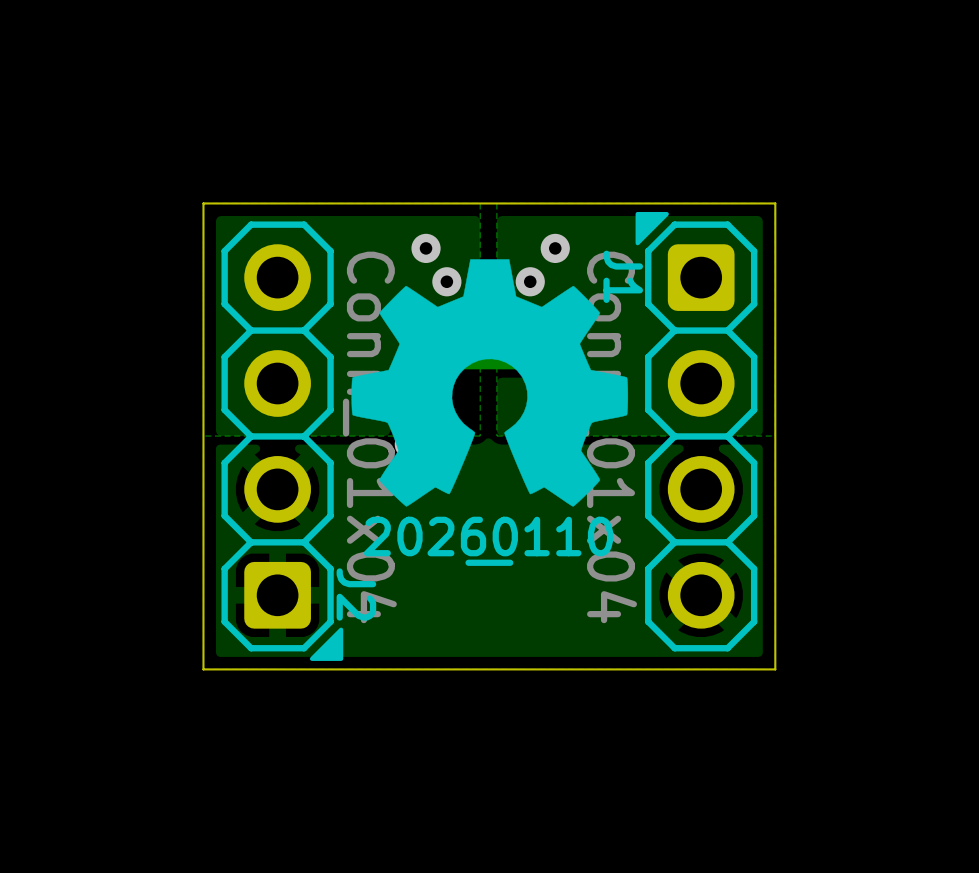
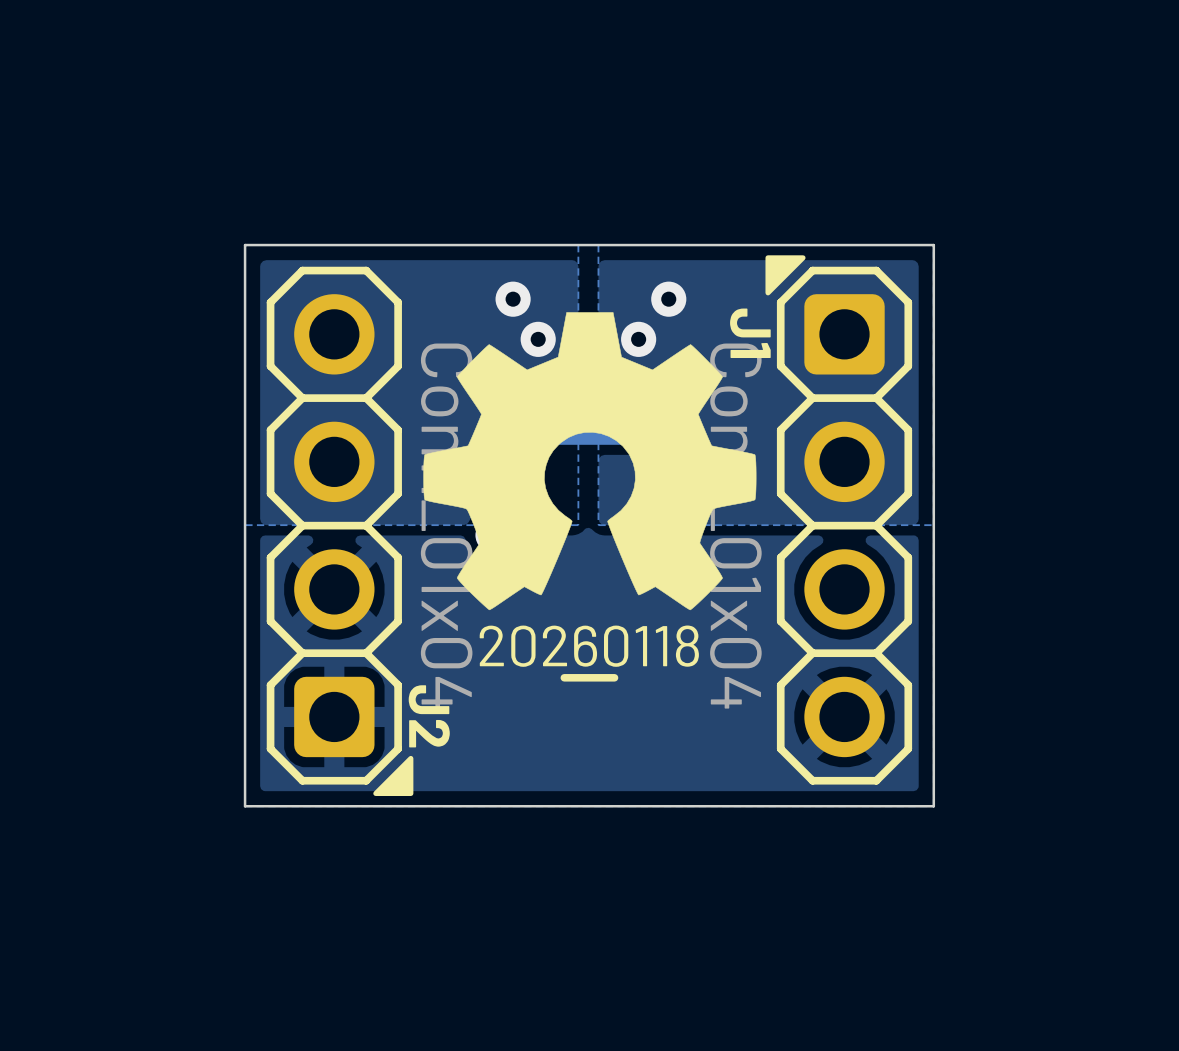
drawing shape: [363, 516, 614, 566] -> [479, 625, 699, 682]

